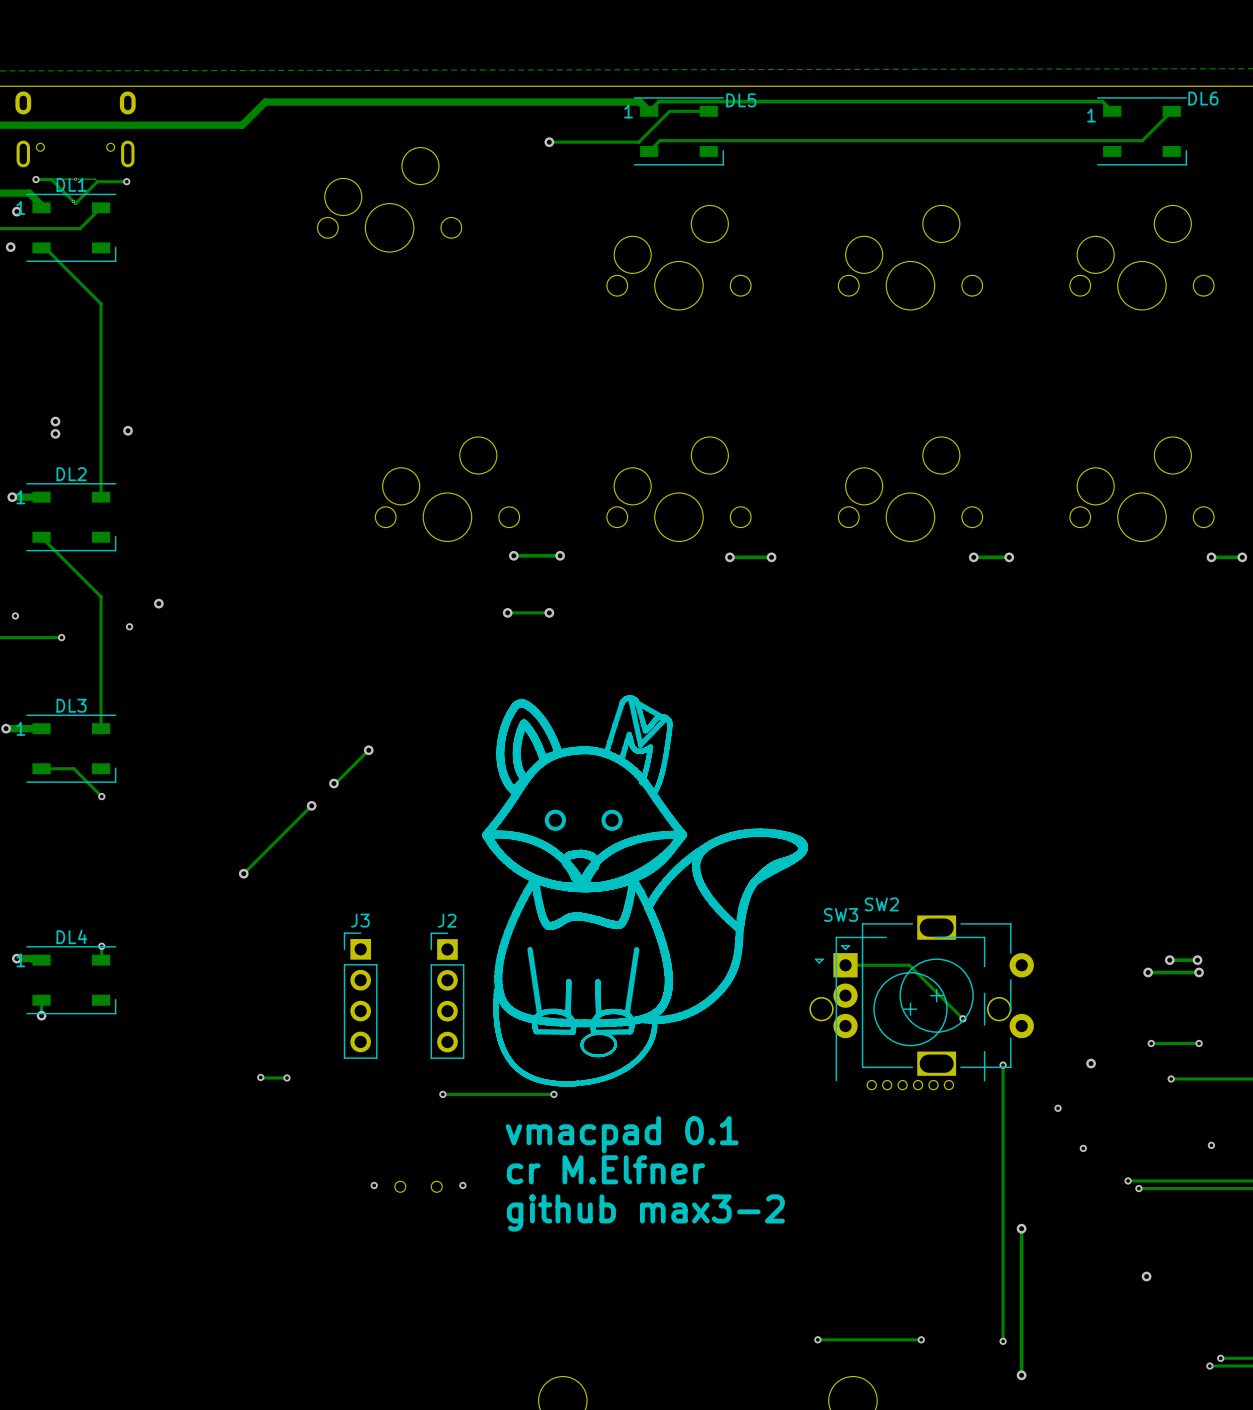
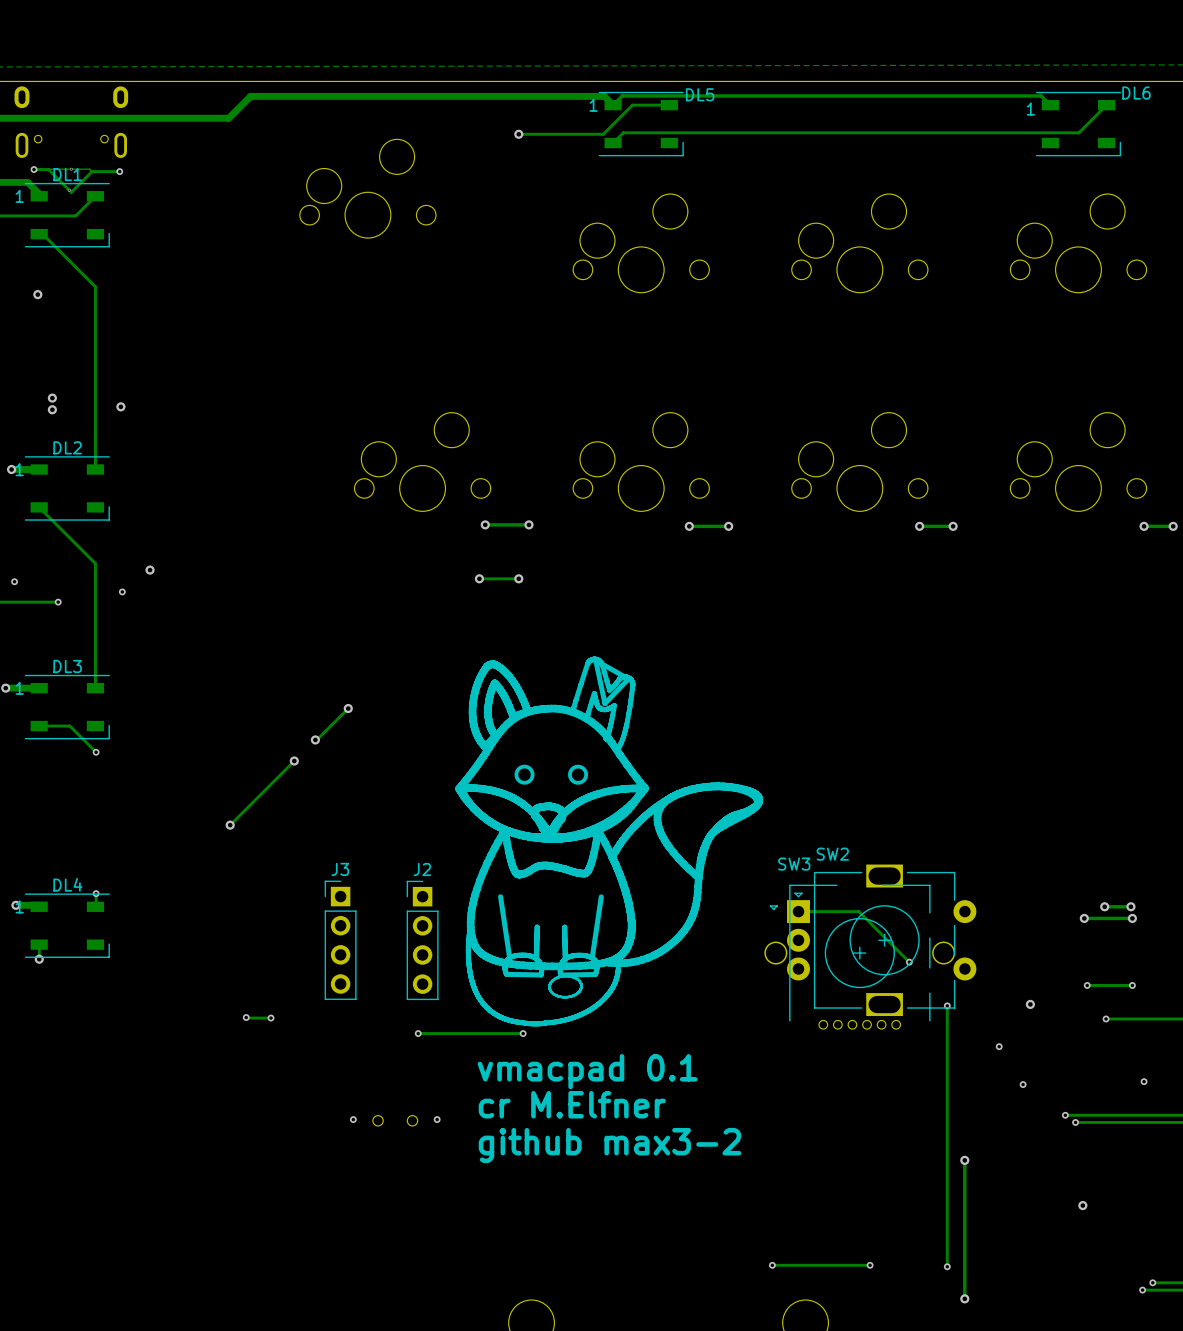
via: (16, 211) -> none
via: (10, 247) -> none
via: none -> (37, 294)

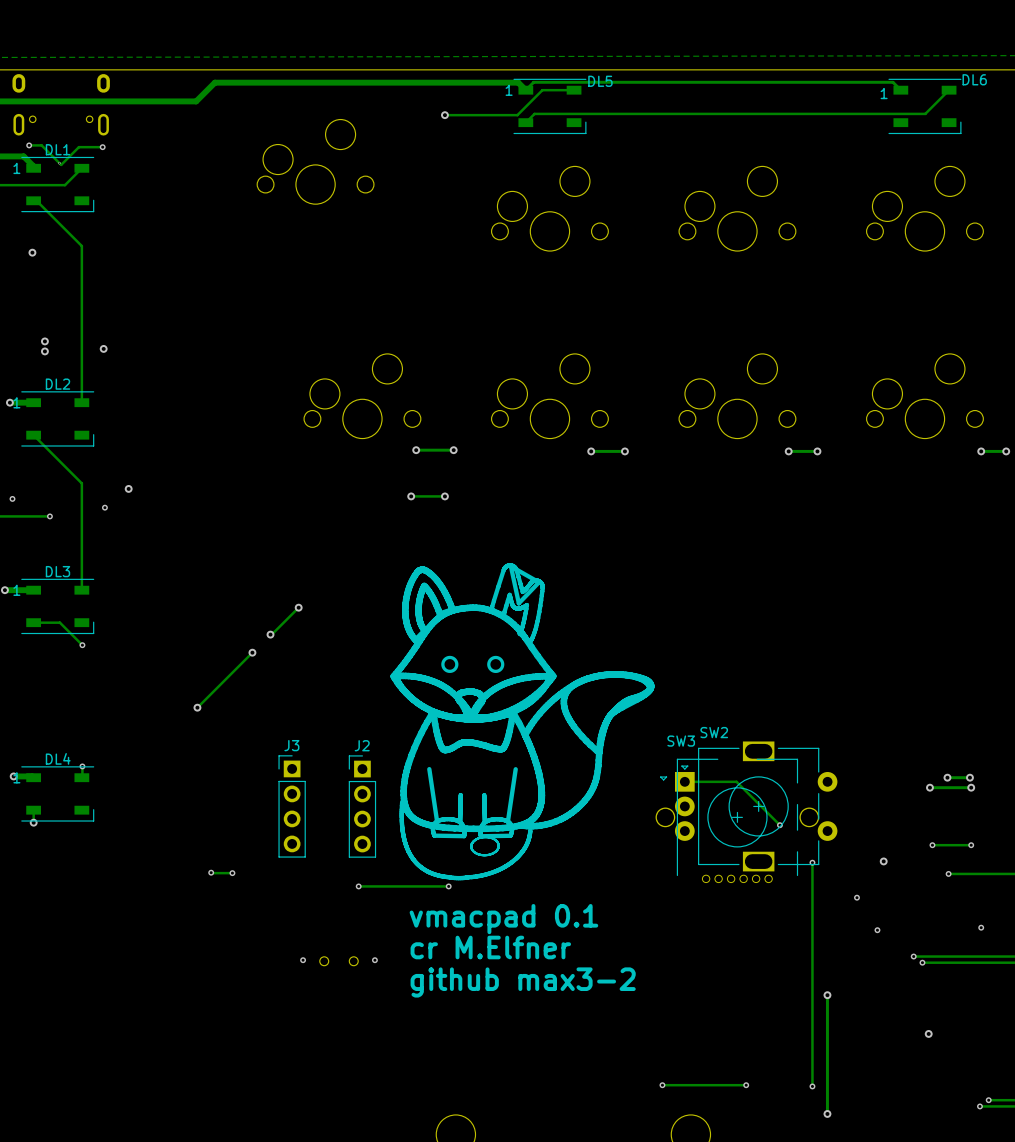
track: (48, 169) (89, 169) (92, 171) -> none
via: (71, 169) -> none

